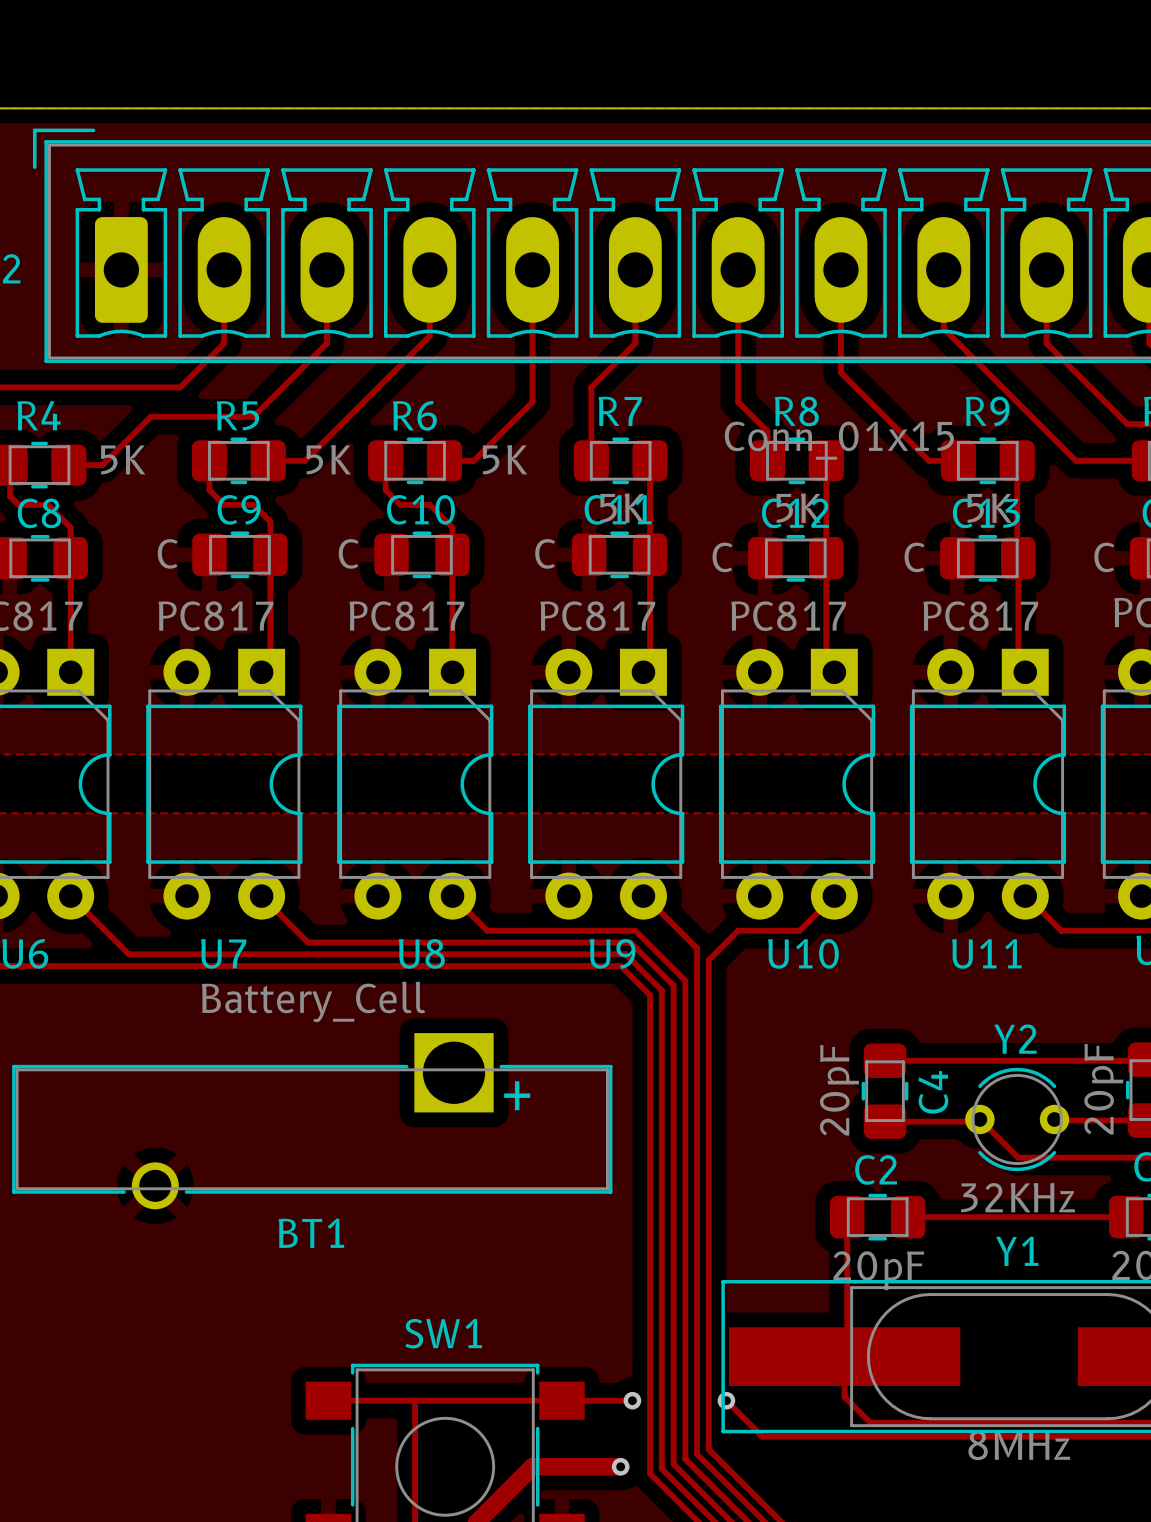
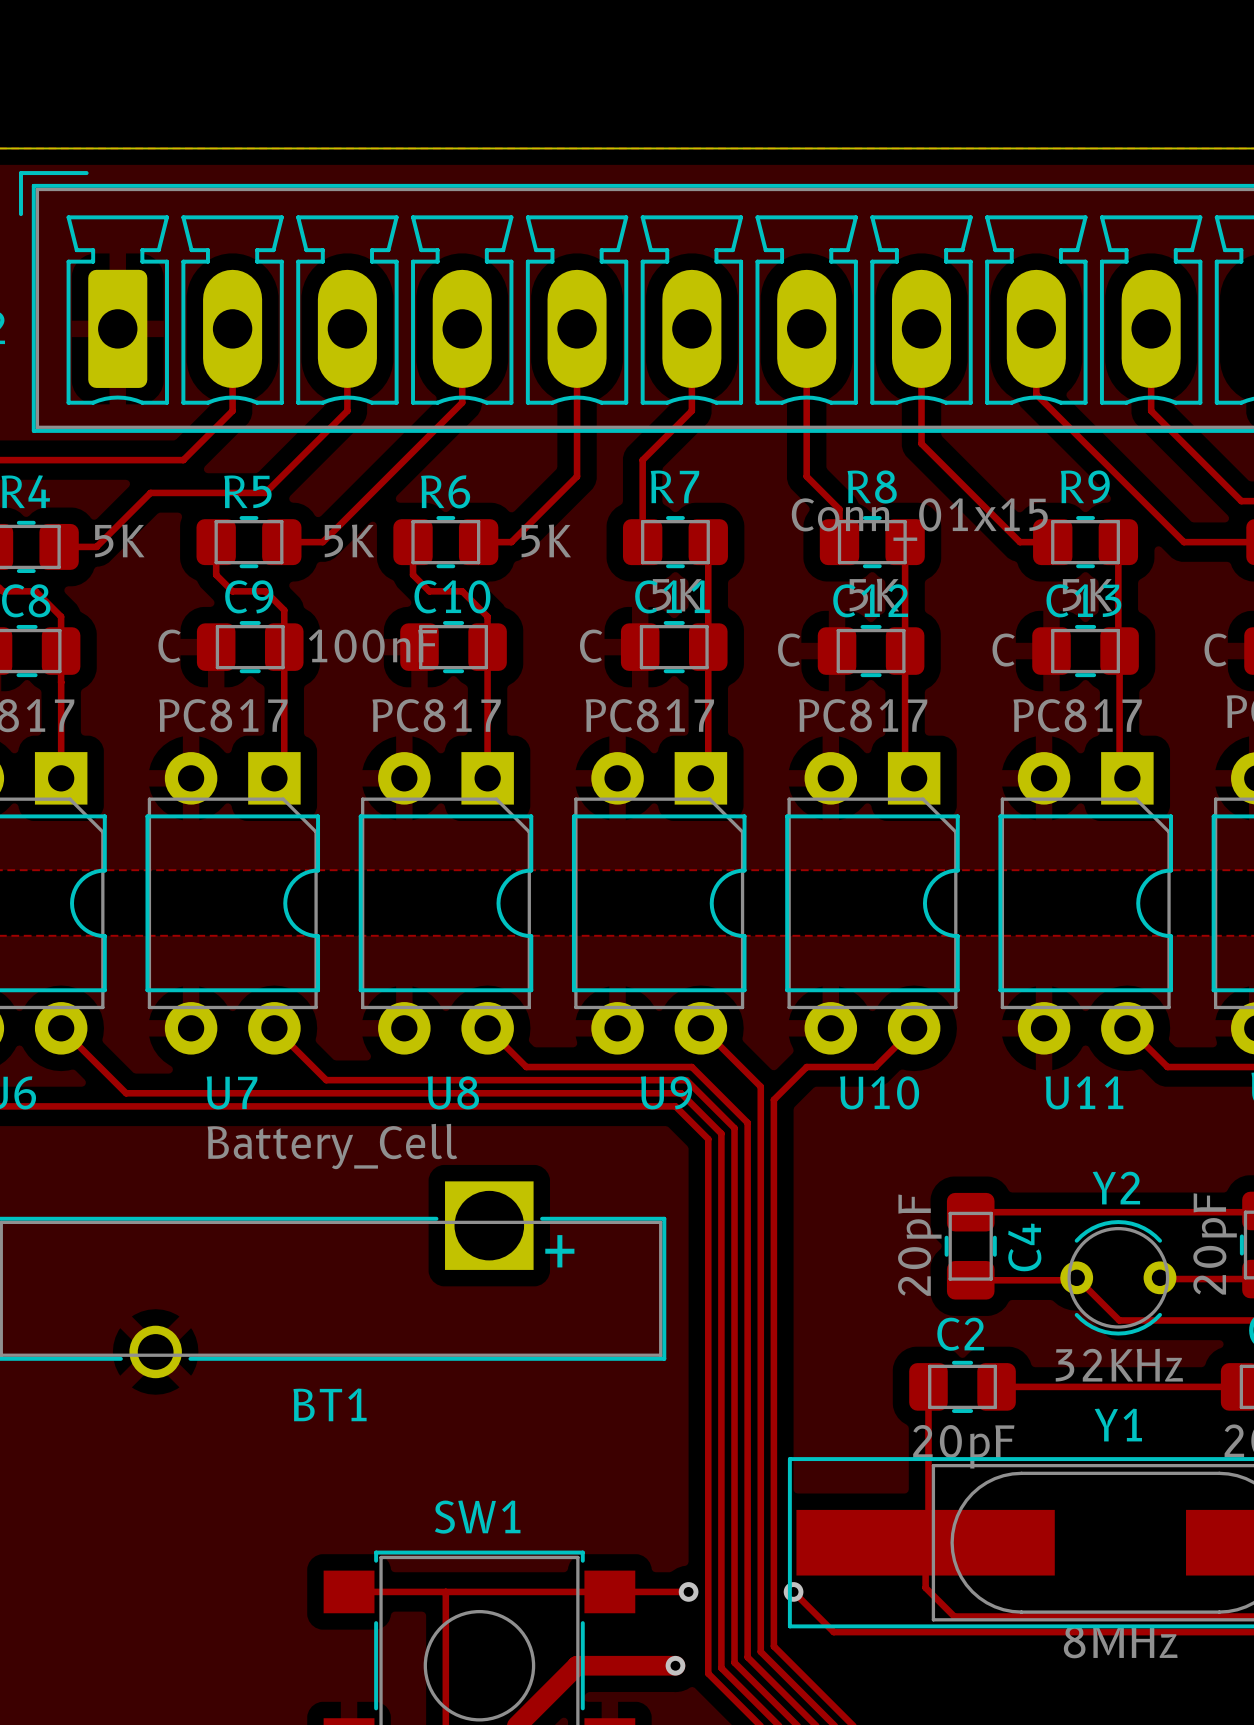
C10 value: C (348, 553) -> 100nF (373, 646)

